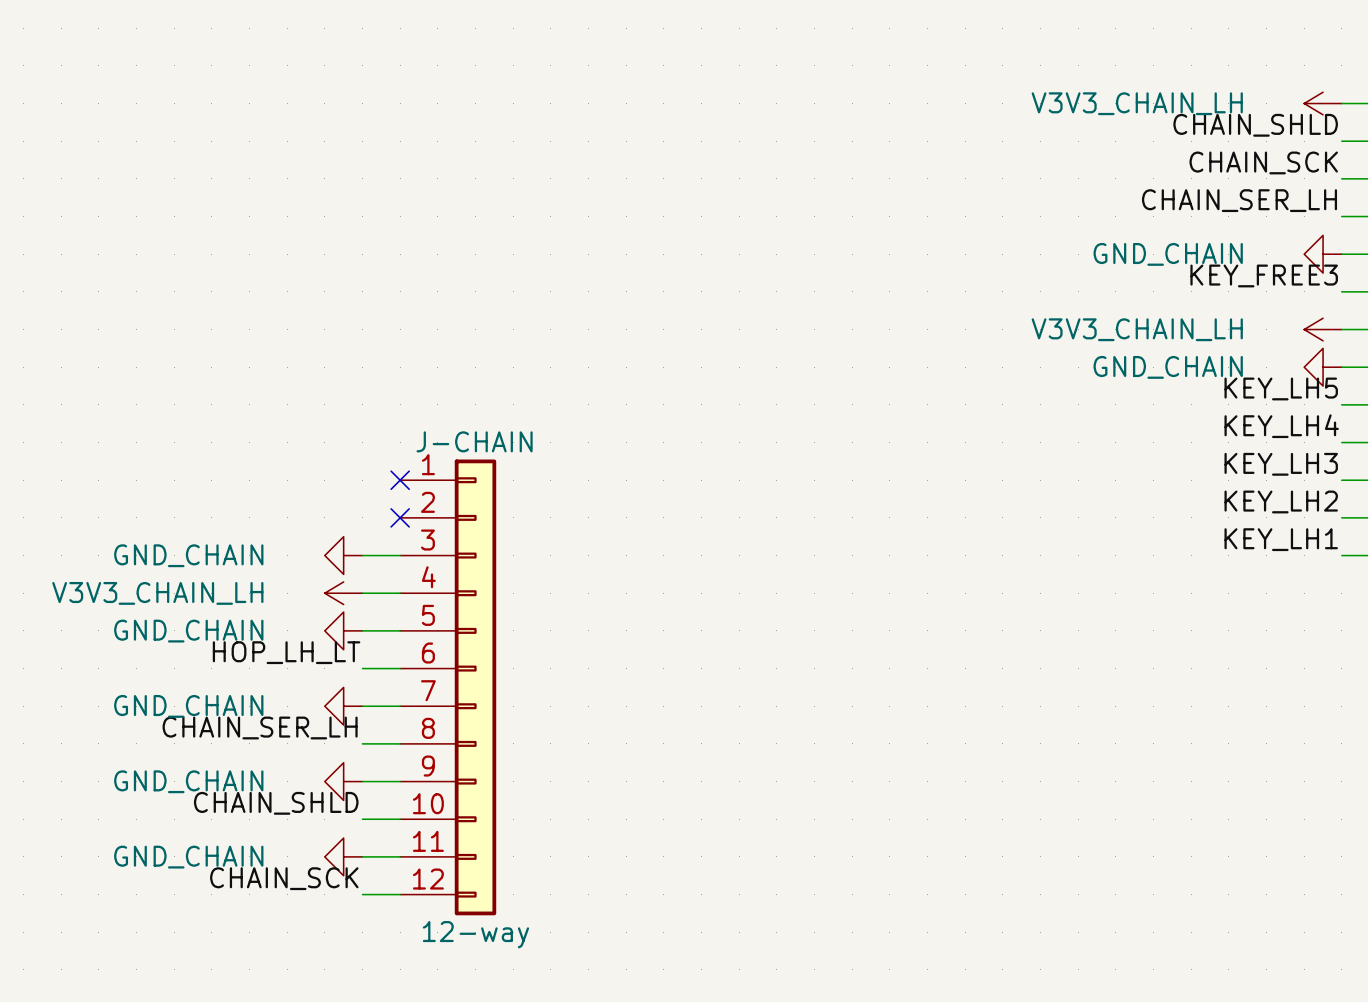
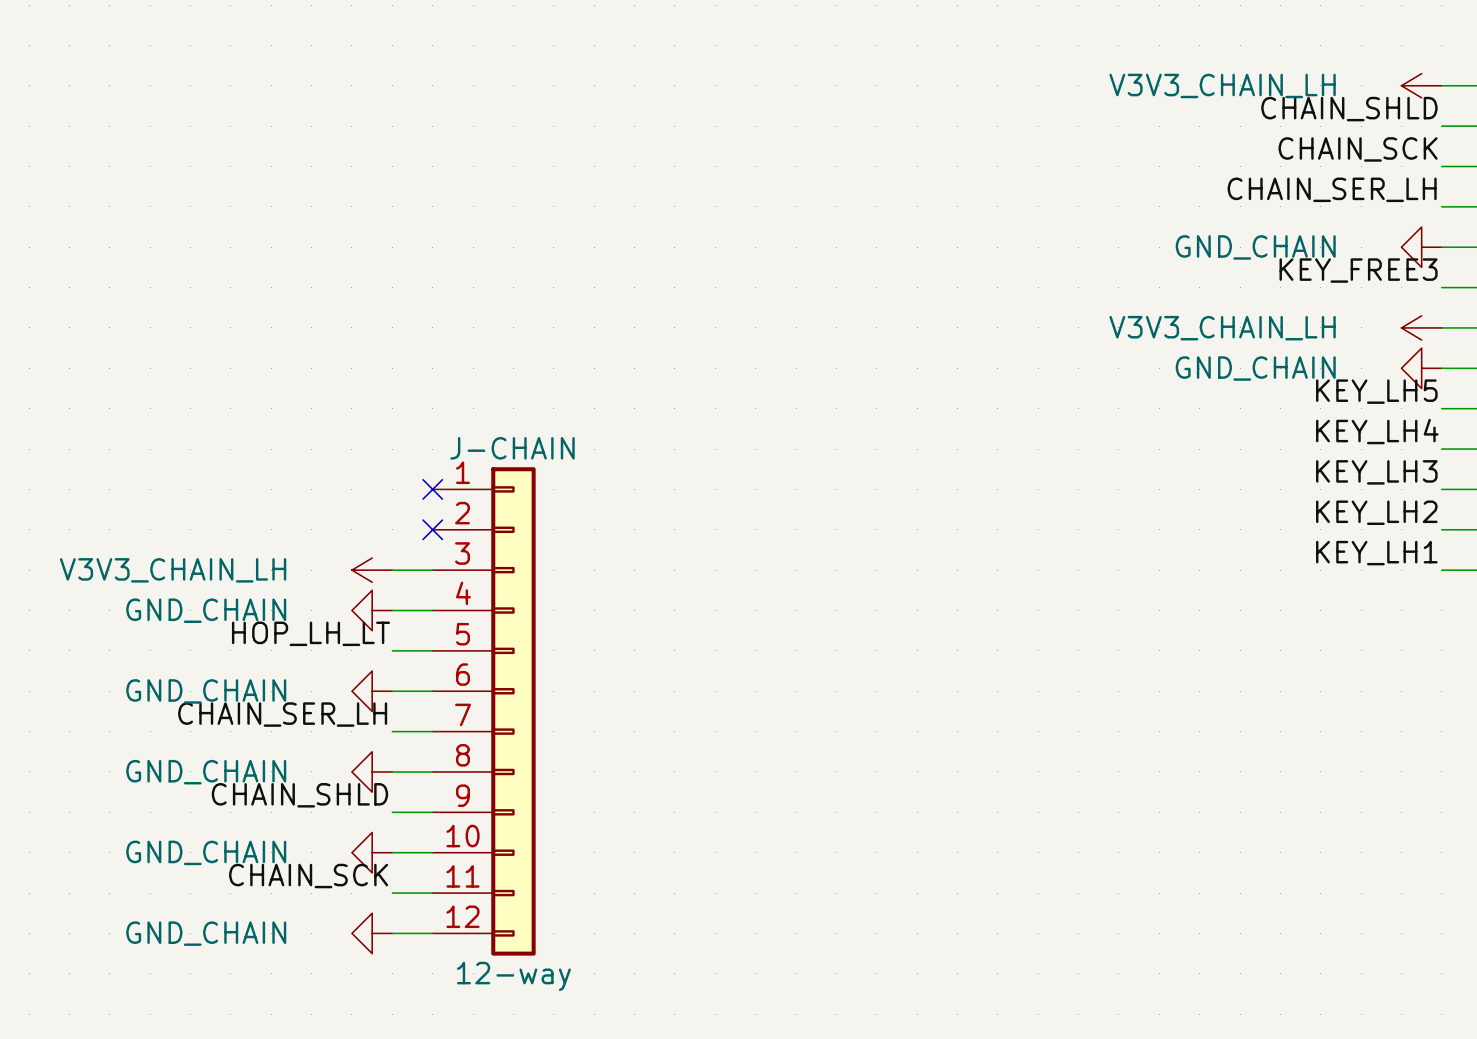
power symbol: GND_CHAIN (343, 555) -> V3V3_CHAIN_LH (372, 570)
power symbol: V3V3_CHAIN_LH (343, 593) -> GND_CHAIN (372, 610)
power symbol: GND_CHAIN (343, 630) -> none
label position: HOP_LH_LT (286, 652) -> HOP_LH_LT (311, 633)
power symbol: none -> GND_CHAIN (372, 691)
power symbol: GND_CHAIN (343, 706) -> none
label position: CHAIN_SER_LH (260, 727) -> CHAIN_SER_LH (282, 714)
power symbol: none -> GND_CHAIN (372, 771)
power symbol: GND_CHAIN (343, 781) -> none
label position: CHAIN_SHLD (276, 803) -> CHAIN_SHLD (299, 795)
power symbol: none -> GND_CHAIN (372, 852)
power symbol: GND_CHAIN (343, 856) -> none
label position: CHAIN_SCK (284, 878) -> CHAIN_SCK (308, 876)
power symbol: none -> GND_CHAIN (372, 933)

